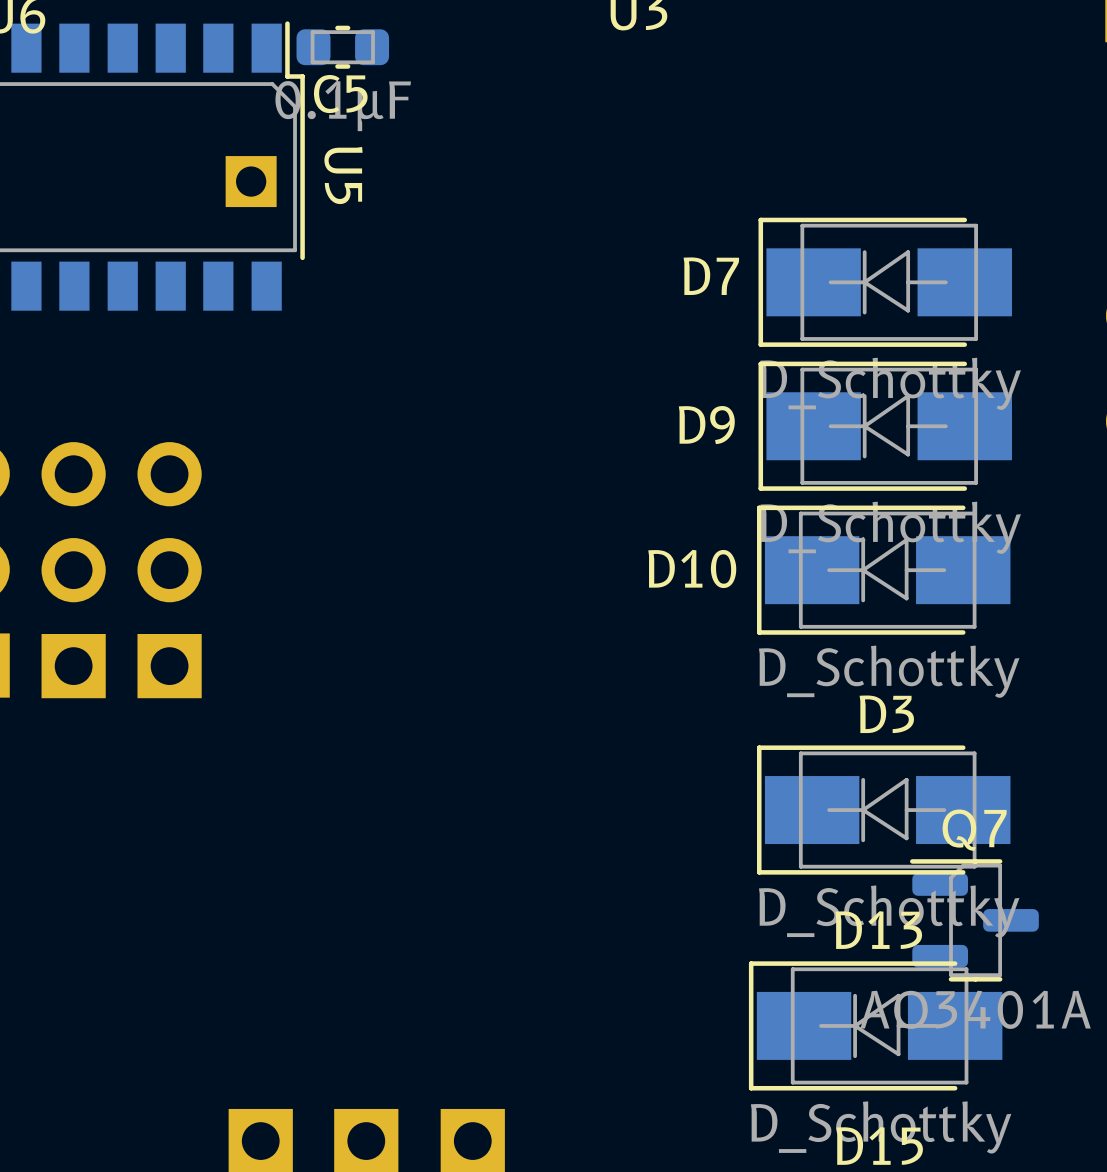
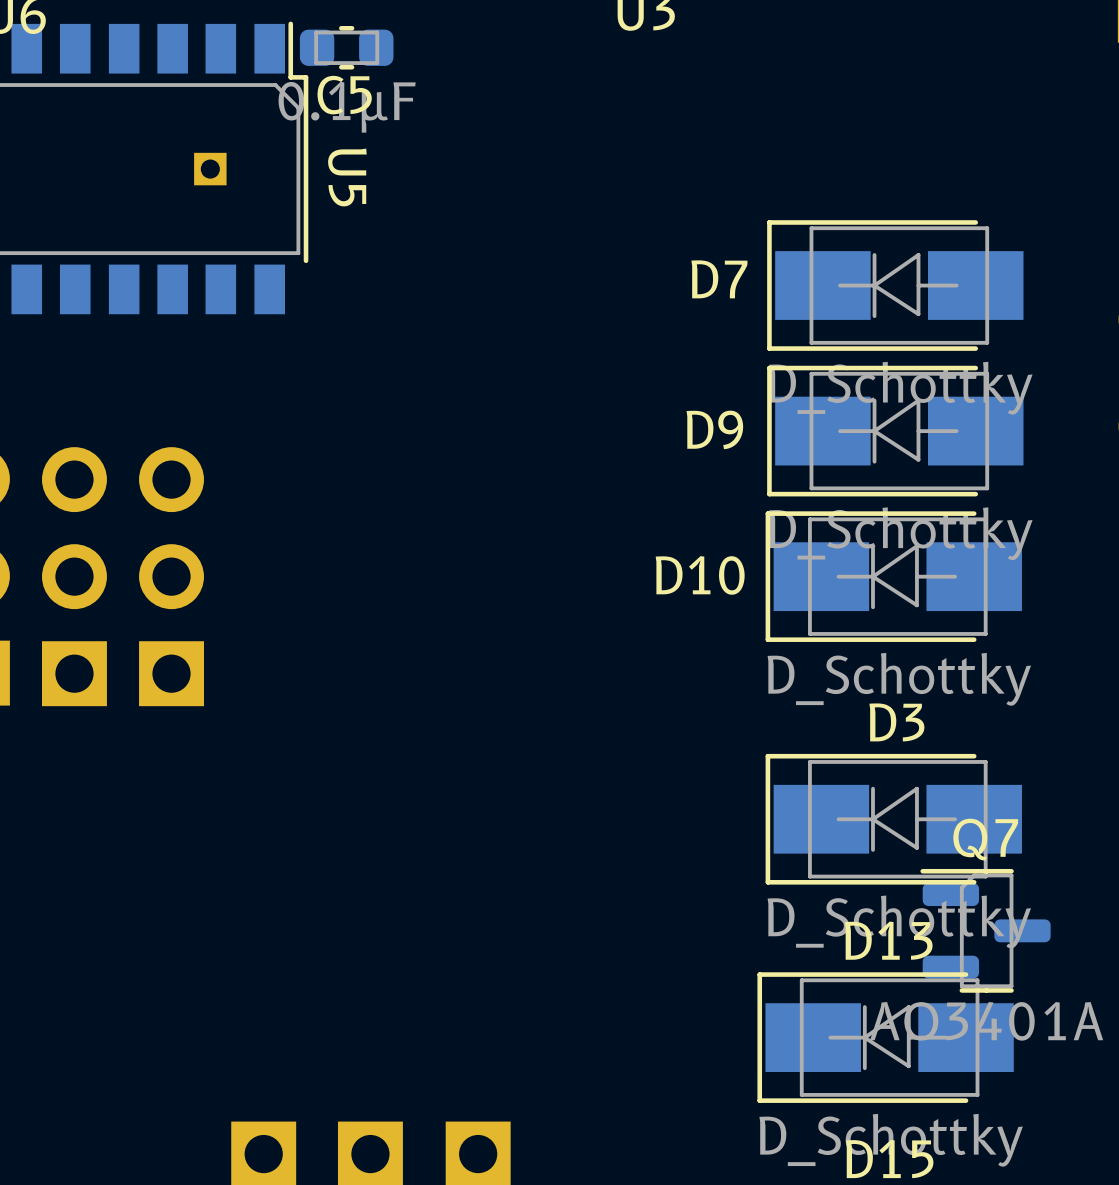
part: none -> (210, 169)
part: (251, 181) -> none

